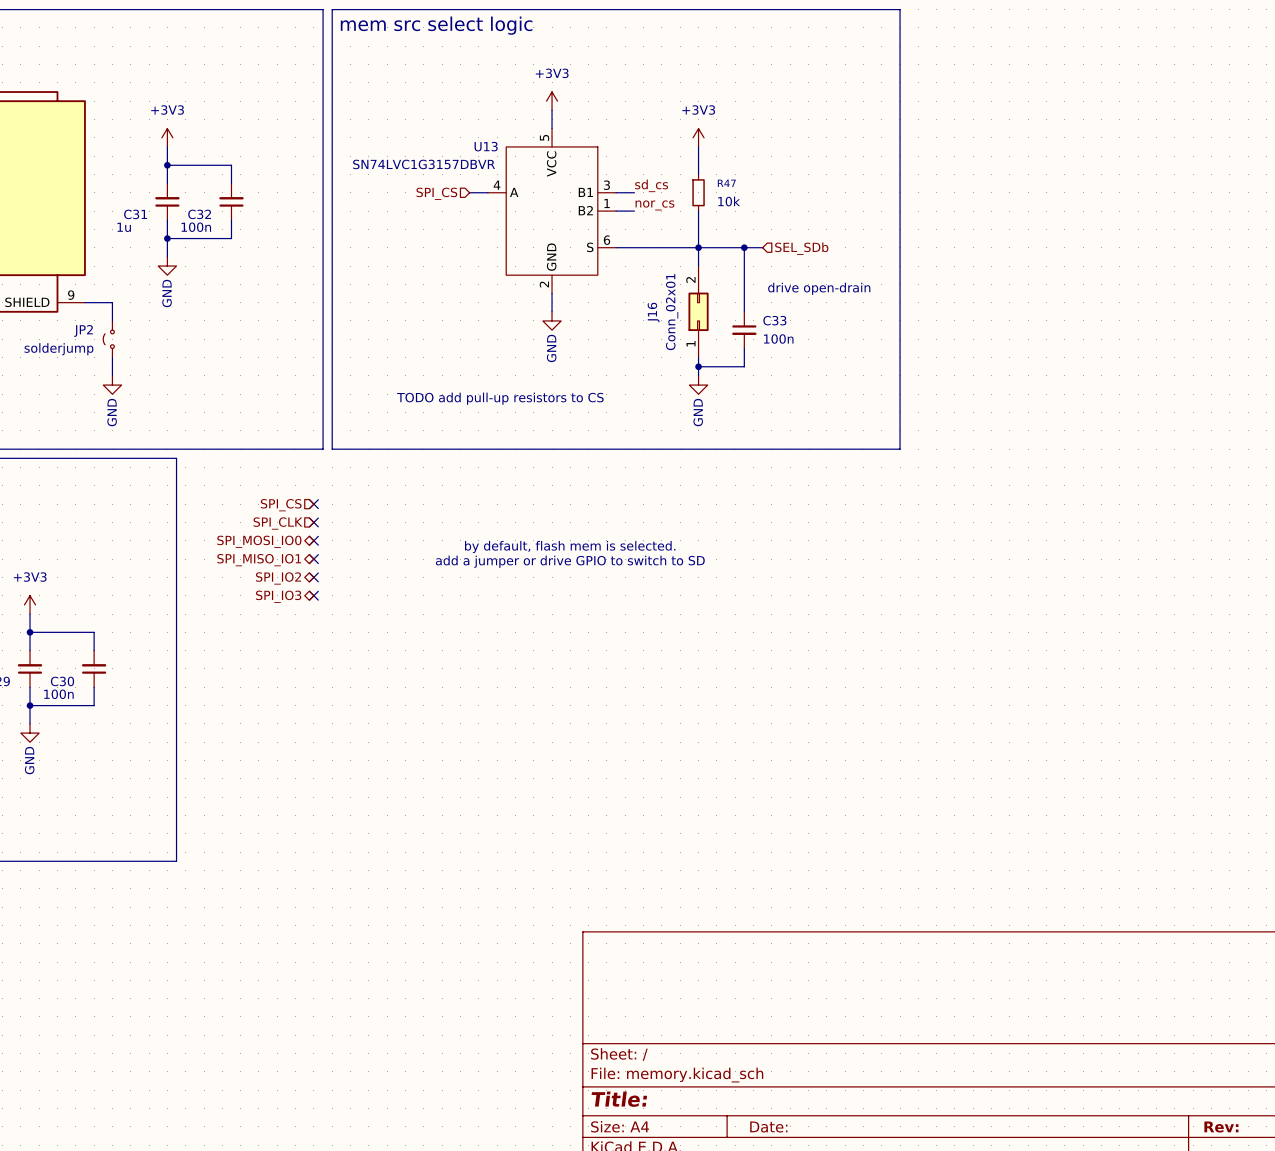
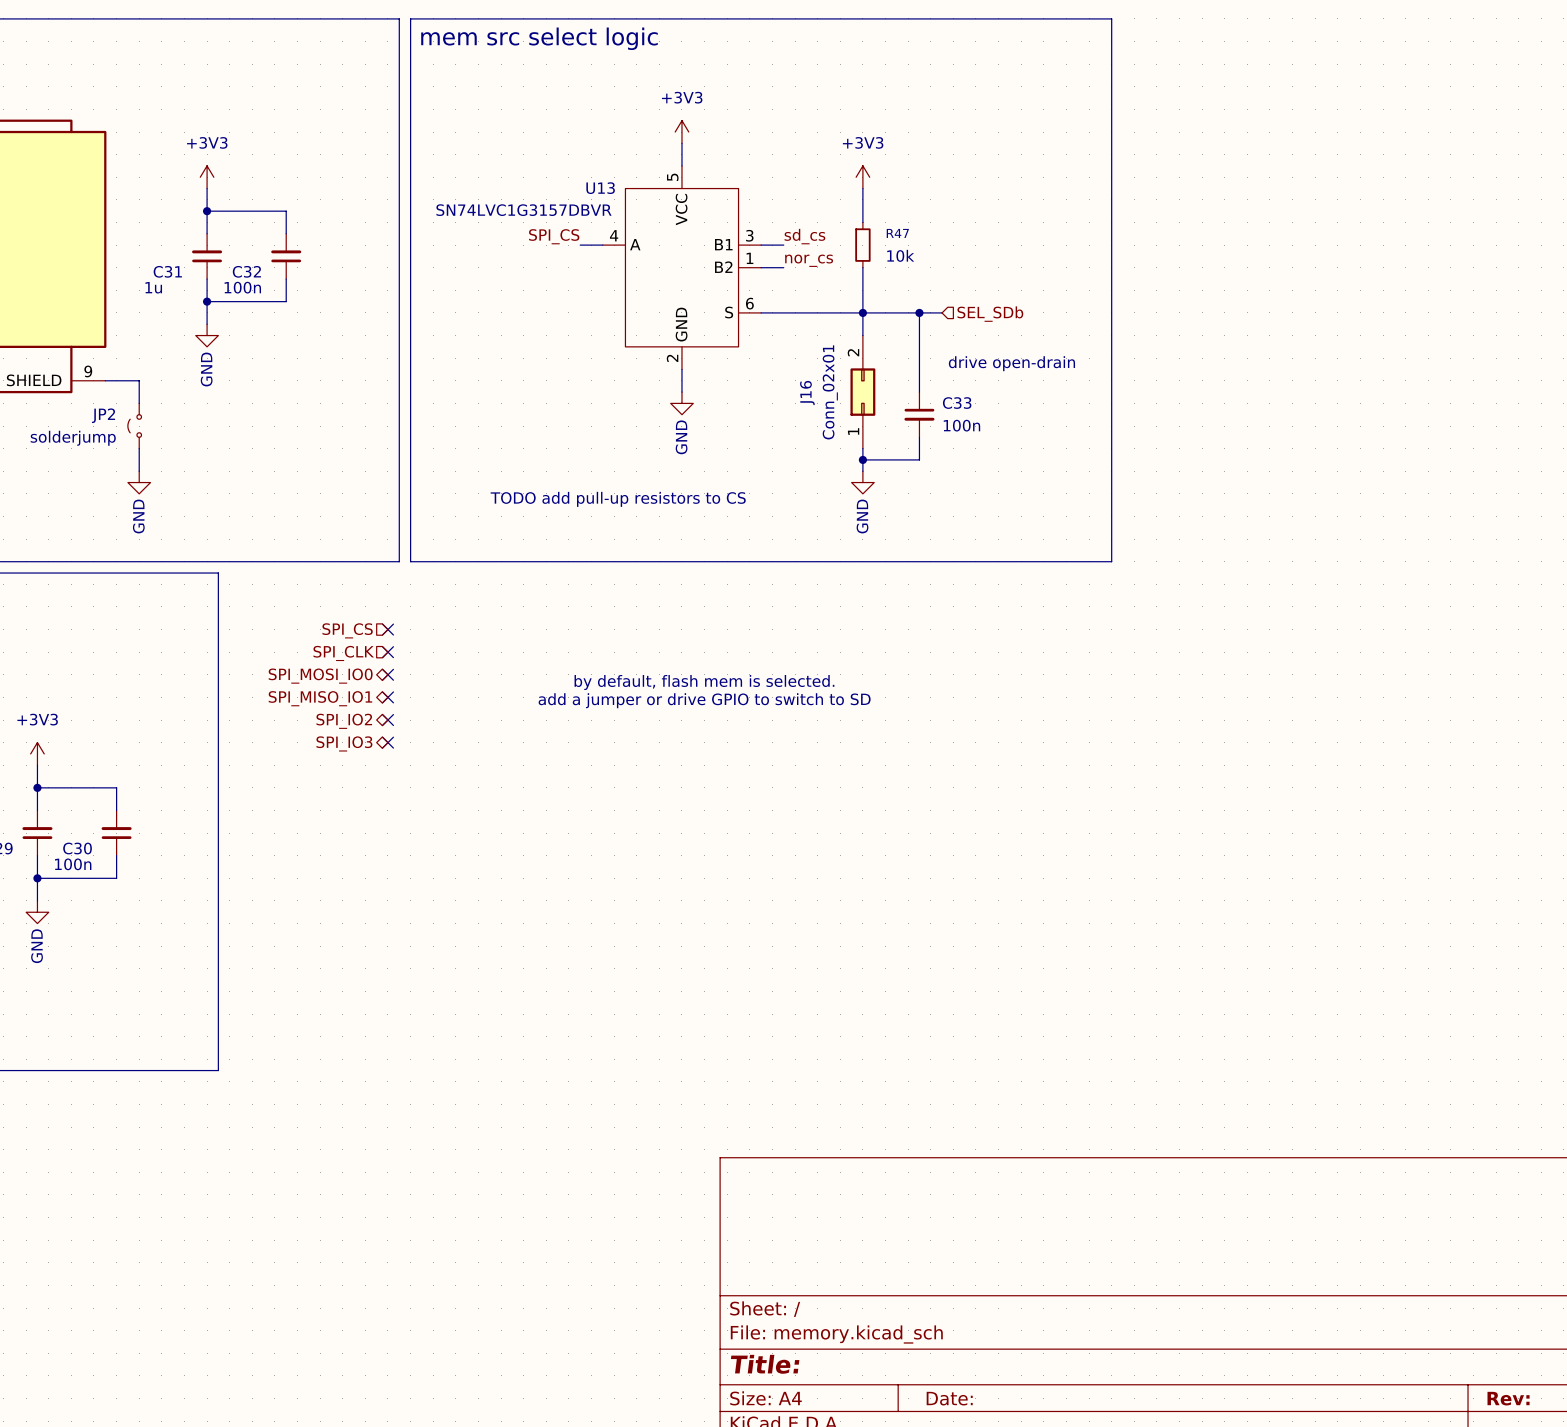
label: none -> SPI_CS (554, 236)
hierarchical label: SPI_CS (436, 193) -> none

